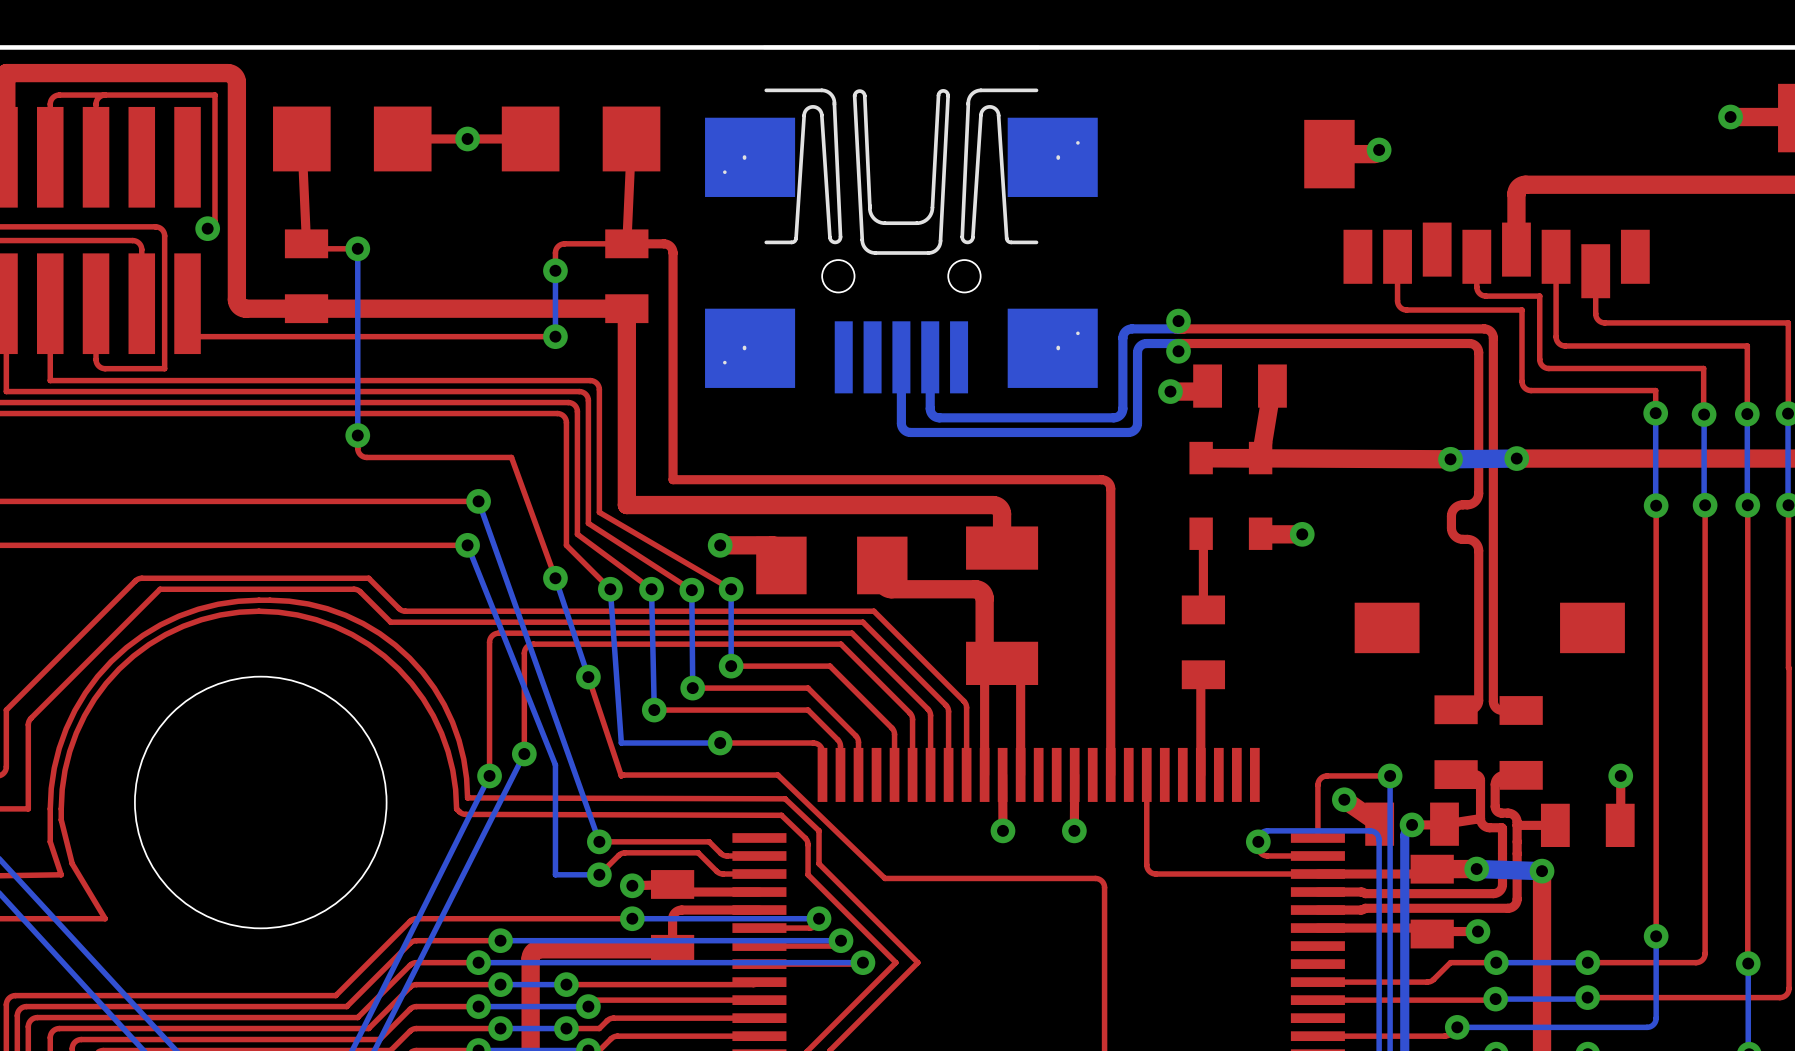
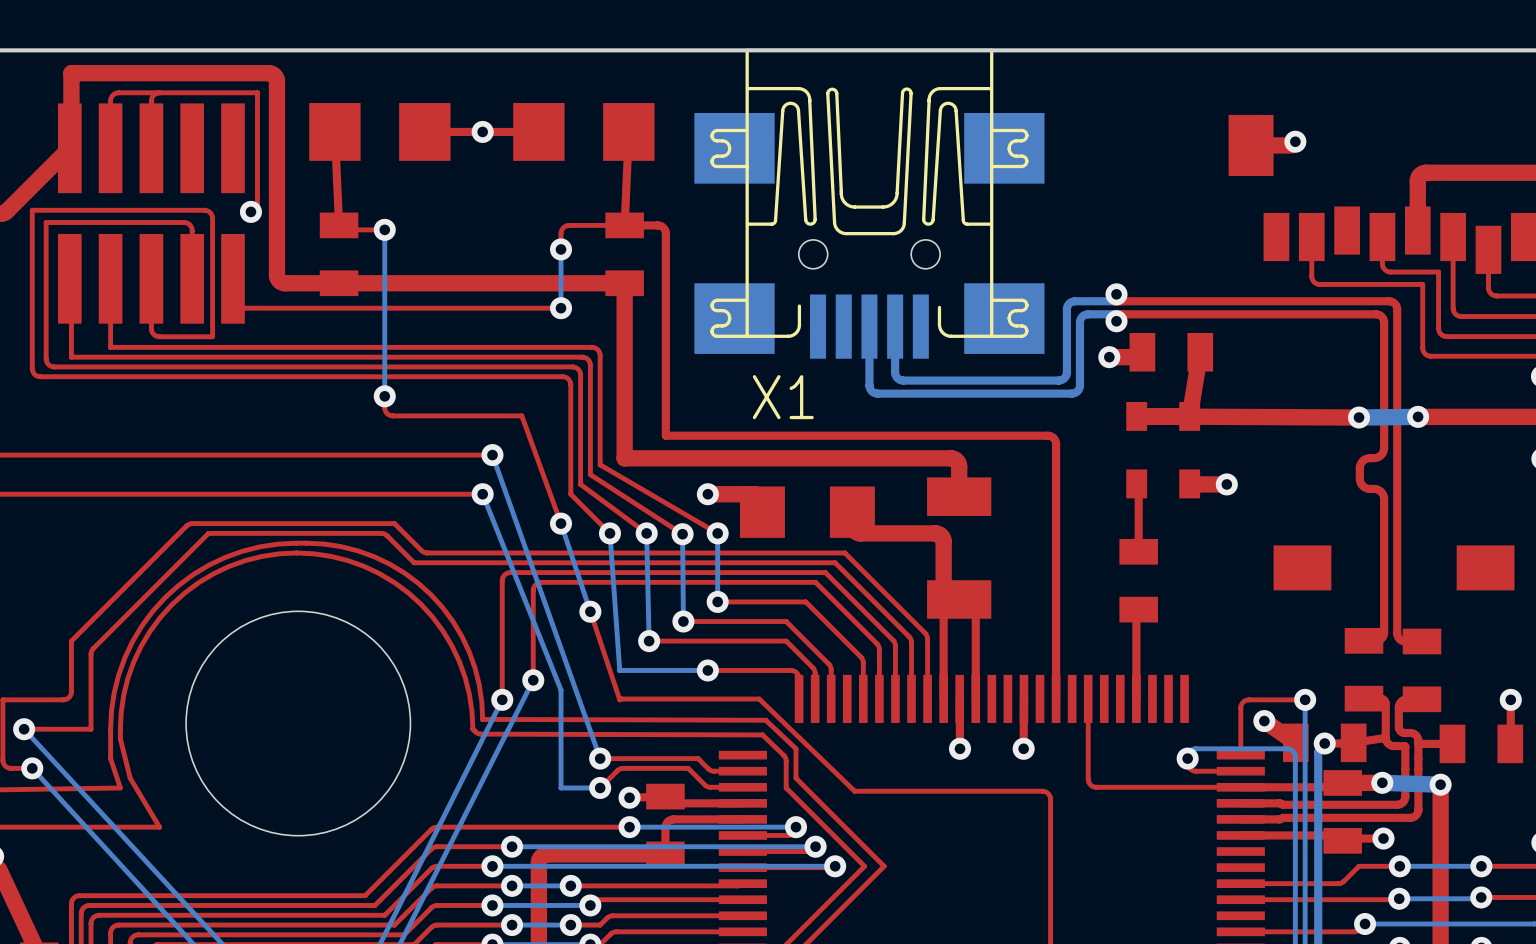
part: (901, 219) -> none
X1: none -> (869, 203)

